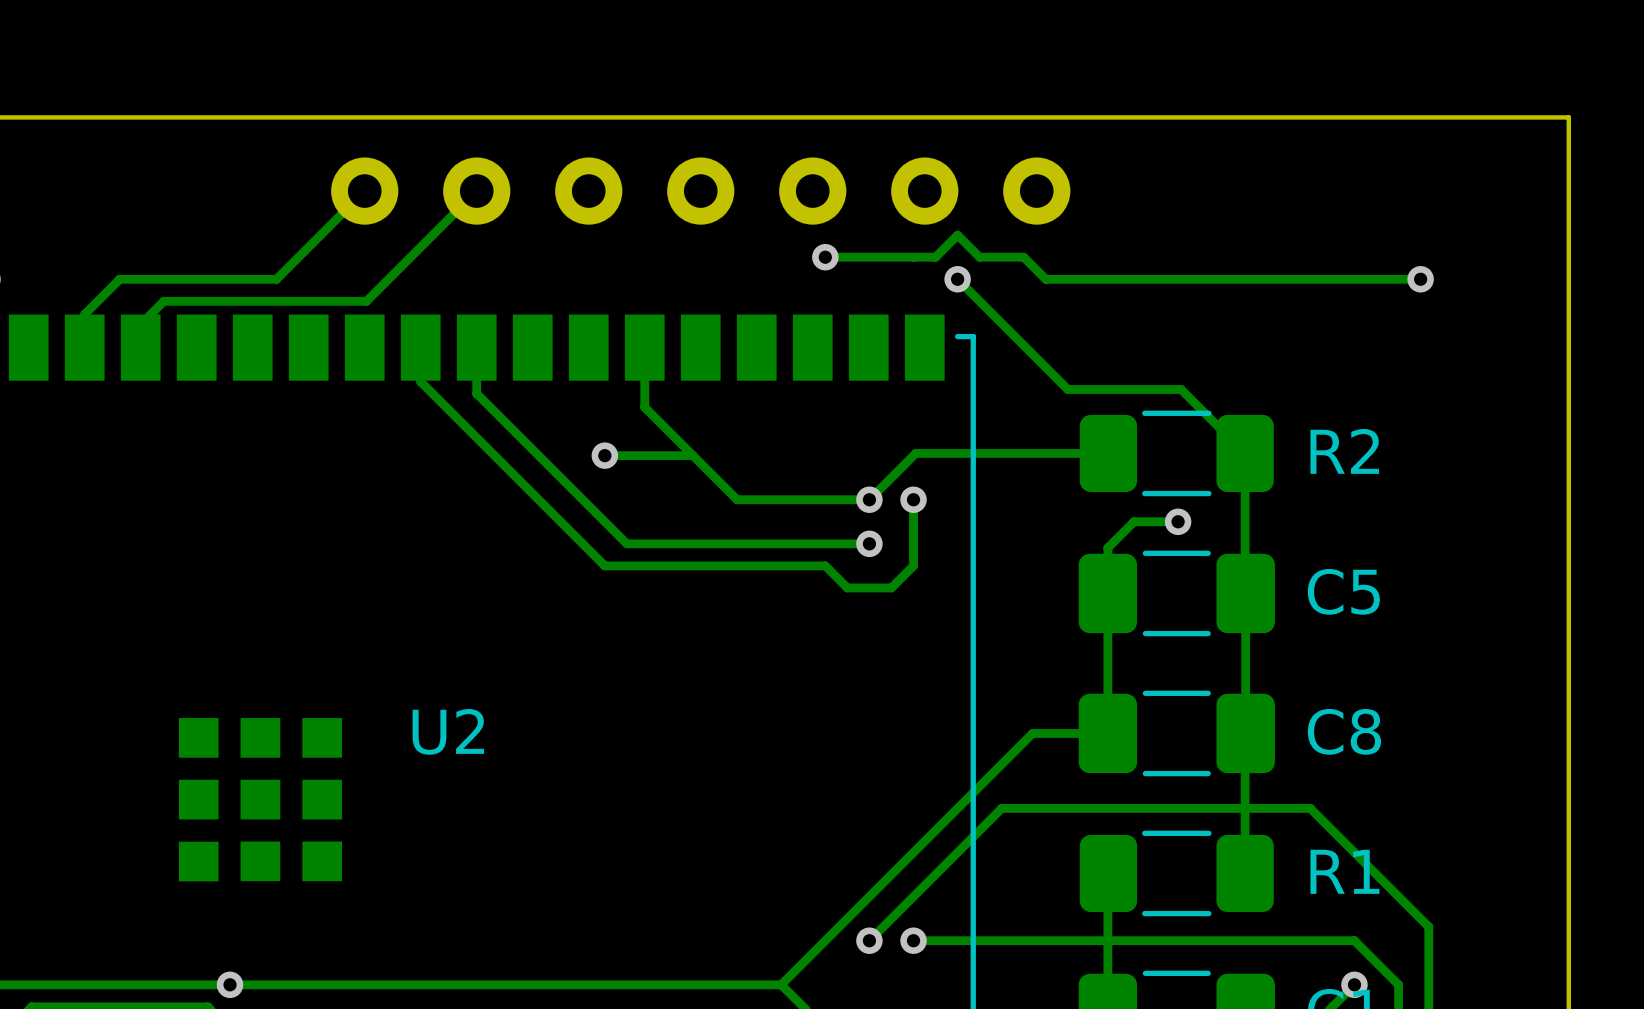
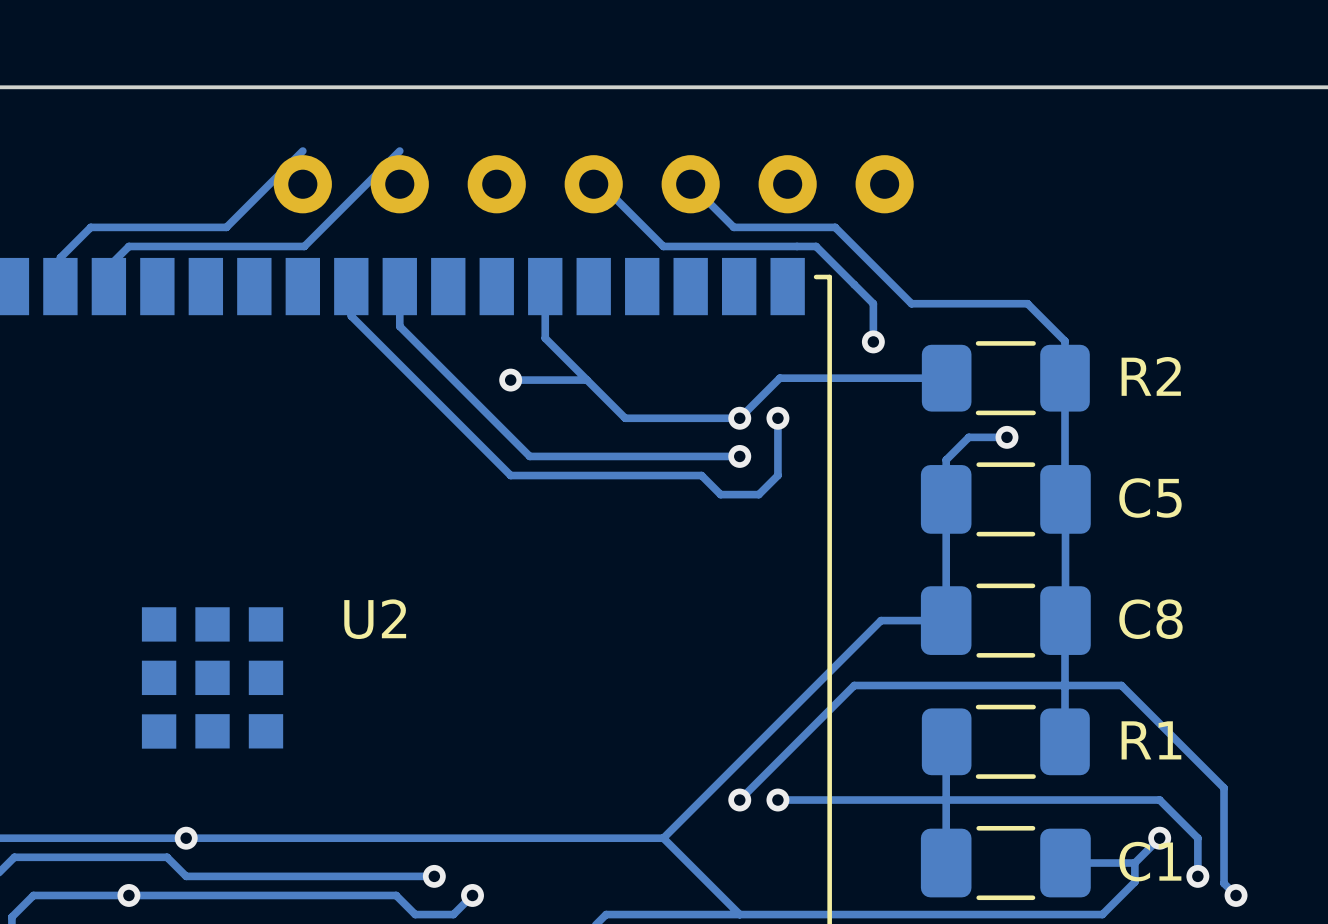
part position: (700, 191) -> (593, 184)
track: none -> (593, 184) (601, 184) (663, 246) (816, 246) (873, 303) (873, 341)
track: (825, 257) (935, 257) (957, 235) (979, 257) (1023, 257) (1045, 279) (1420, 279) -> none
via: (825, 257) -> none
track: (957, 279) (1067, 389) (1181, 389) (1245, 453) -> (690, 184) (733, 227) (835, 227) (911, 303) (1027, 303) (1065, 341) (1065, 378)
via: (957, 279) -> none
via: (1420, 279) -> none
via: none -> (873, 341)

